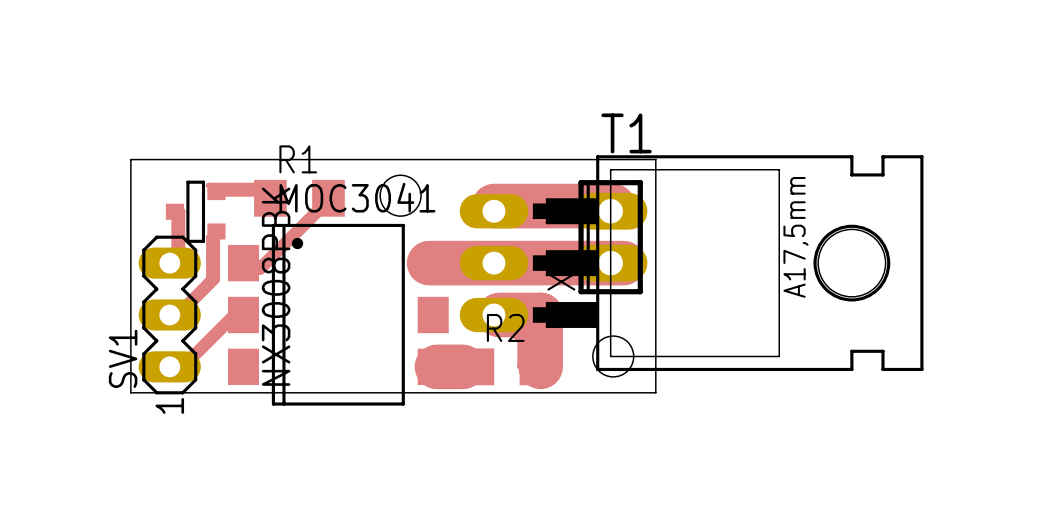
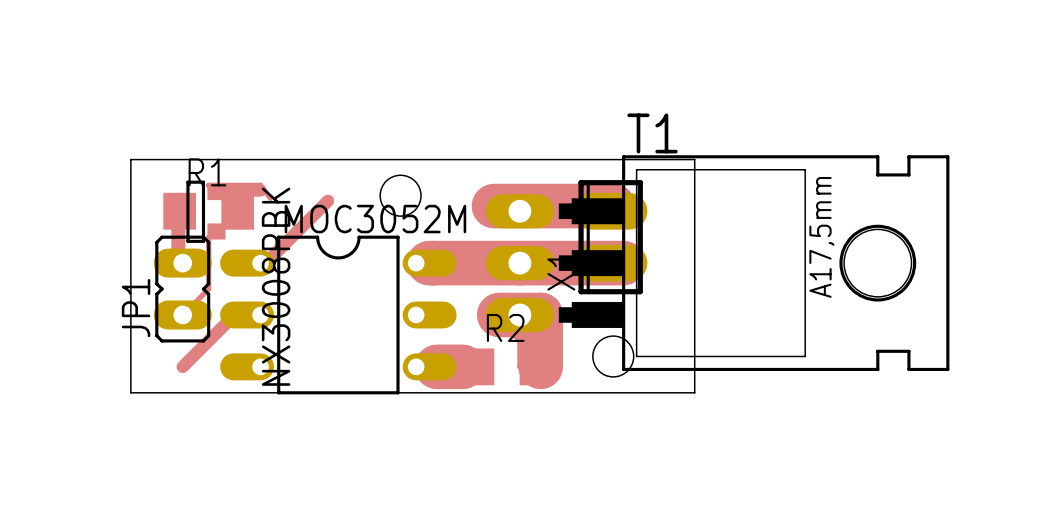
board edge: (655, 159) (655, 392) -> (655, 159) (694, 159) (694, 392) (655, 392)
R1 position: (299, 198) -> (208, 211)
top track: (213, 237) (213, 278) (177, 314) (167, 314) -> none
T1 position: (691, 263) -> (717, 263)
JP1: none -> (182, 289)
SV1: (169, 314) -> none
MOC3041: (338, 314) -> none
MOC3052M: none -> (338, 314)

